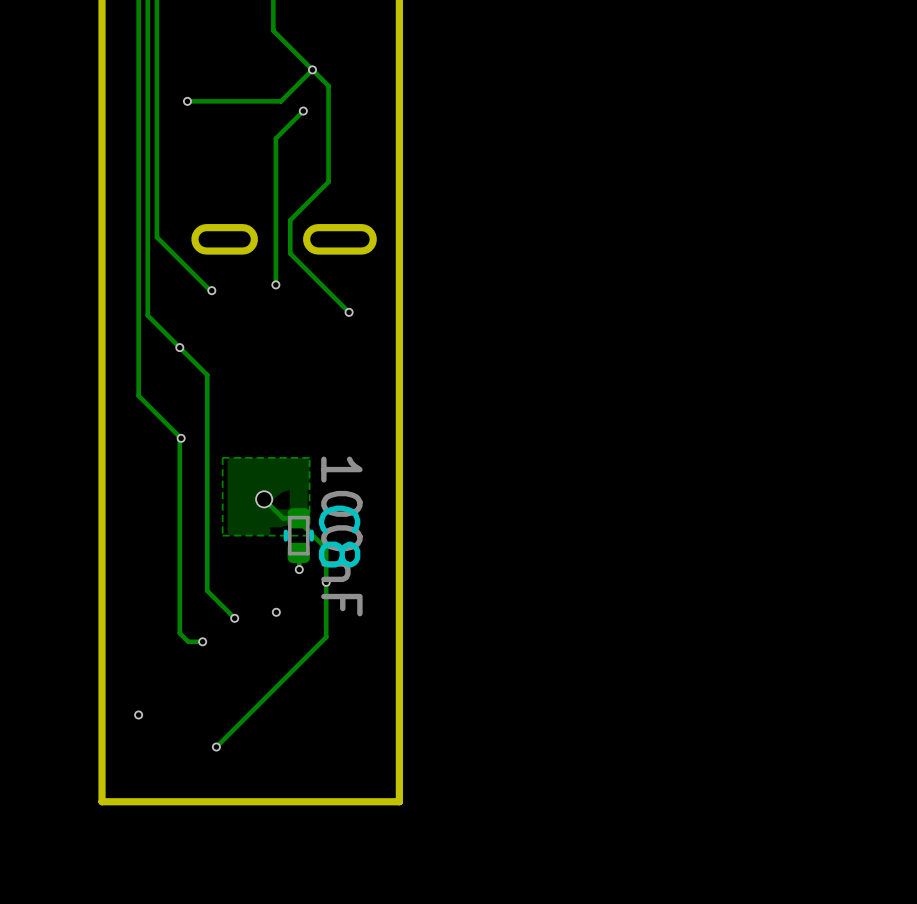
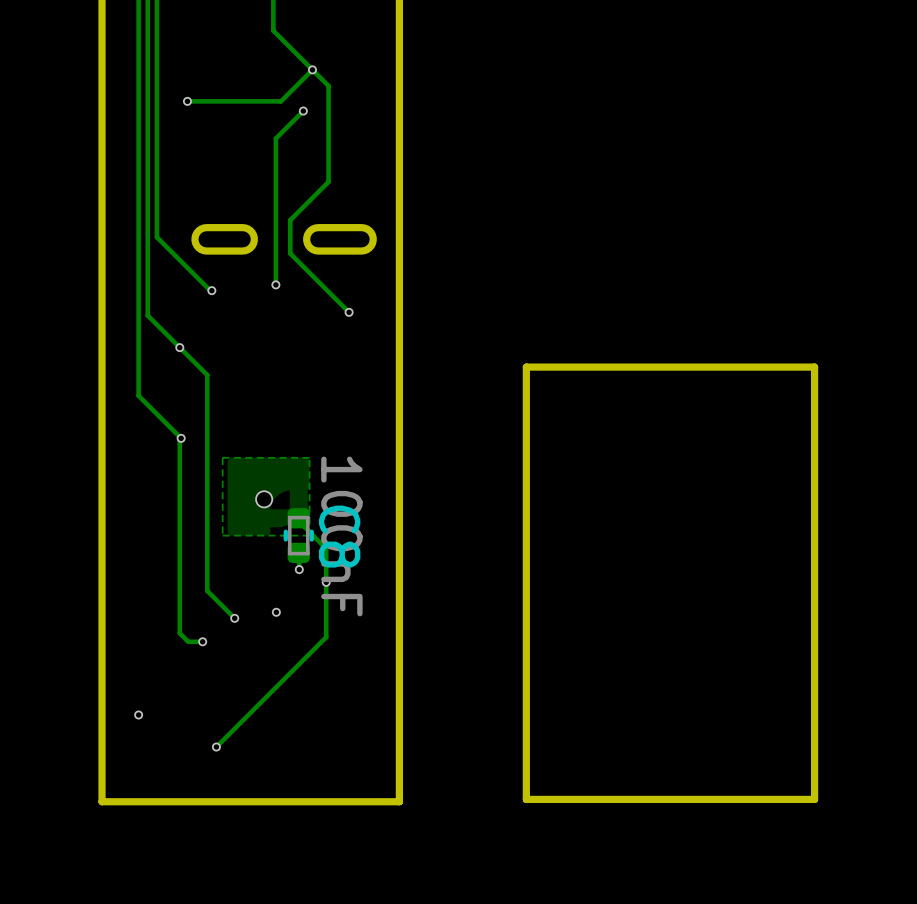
board edge: none -> (814, 367) (526, 367) (526, 799) (814, 799) (814, 367)
track: (264, 499) (283, 518) (295, 518) -> none

